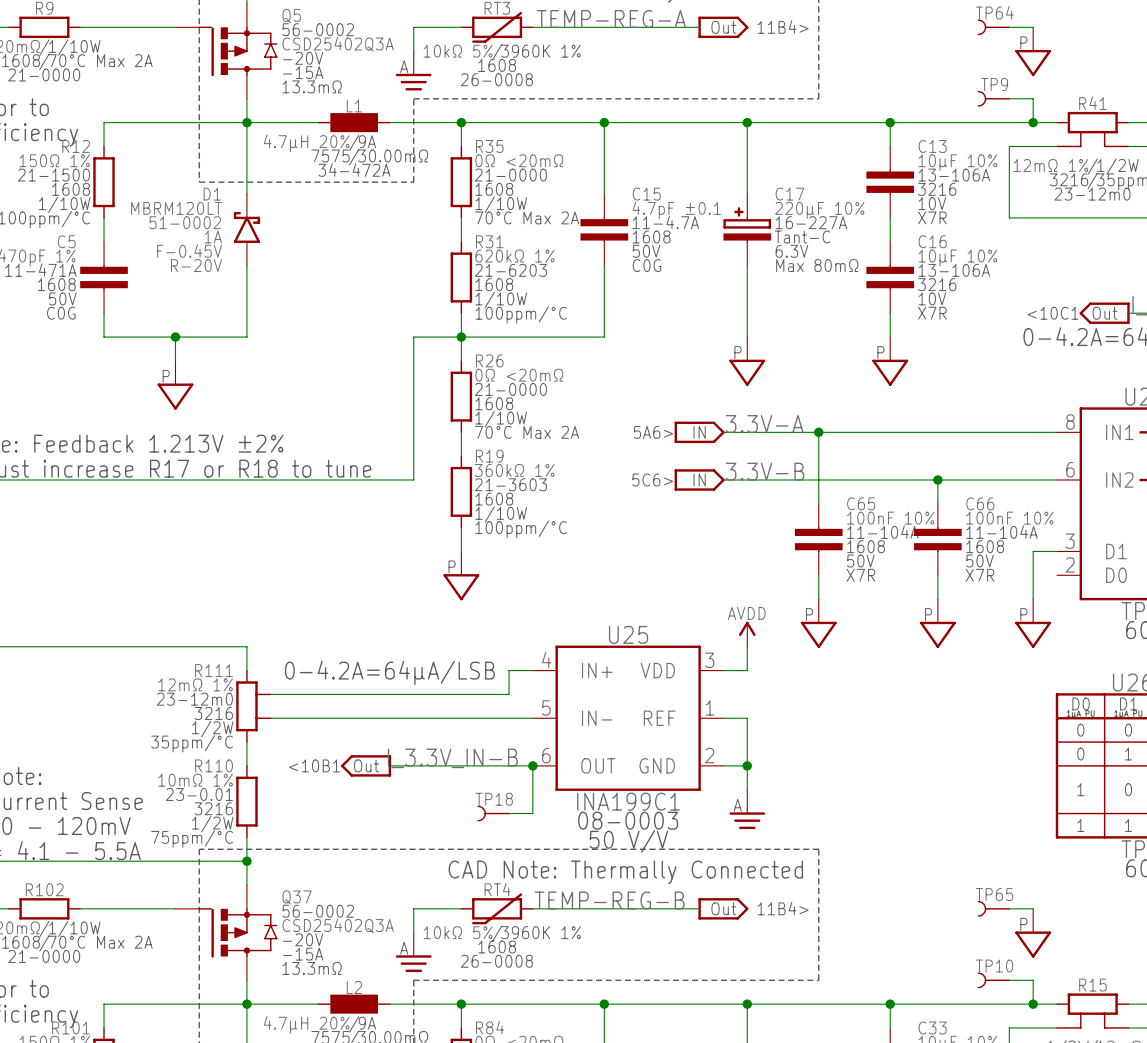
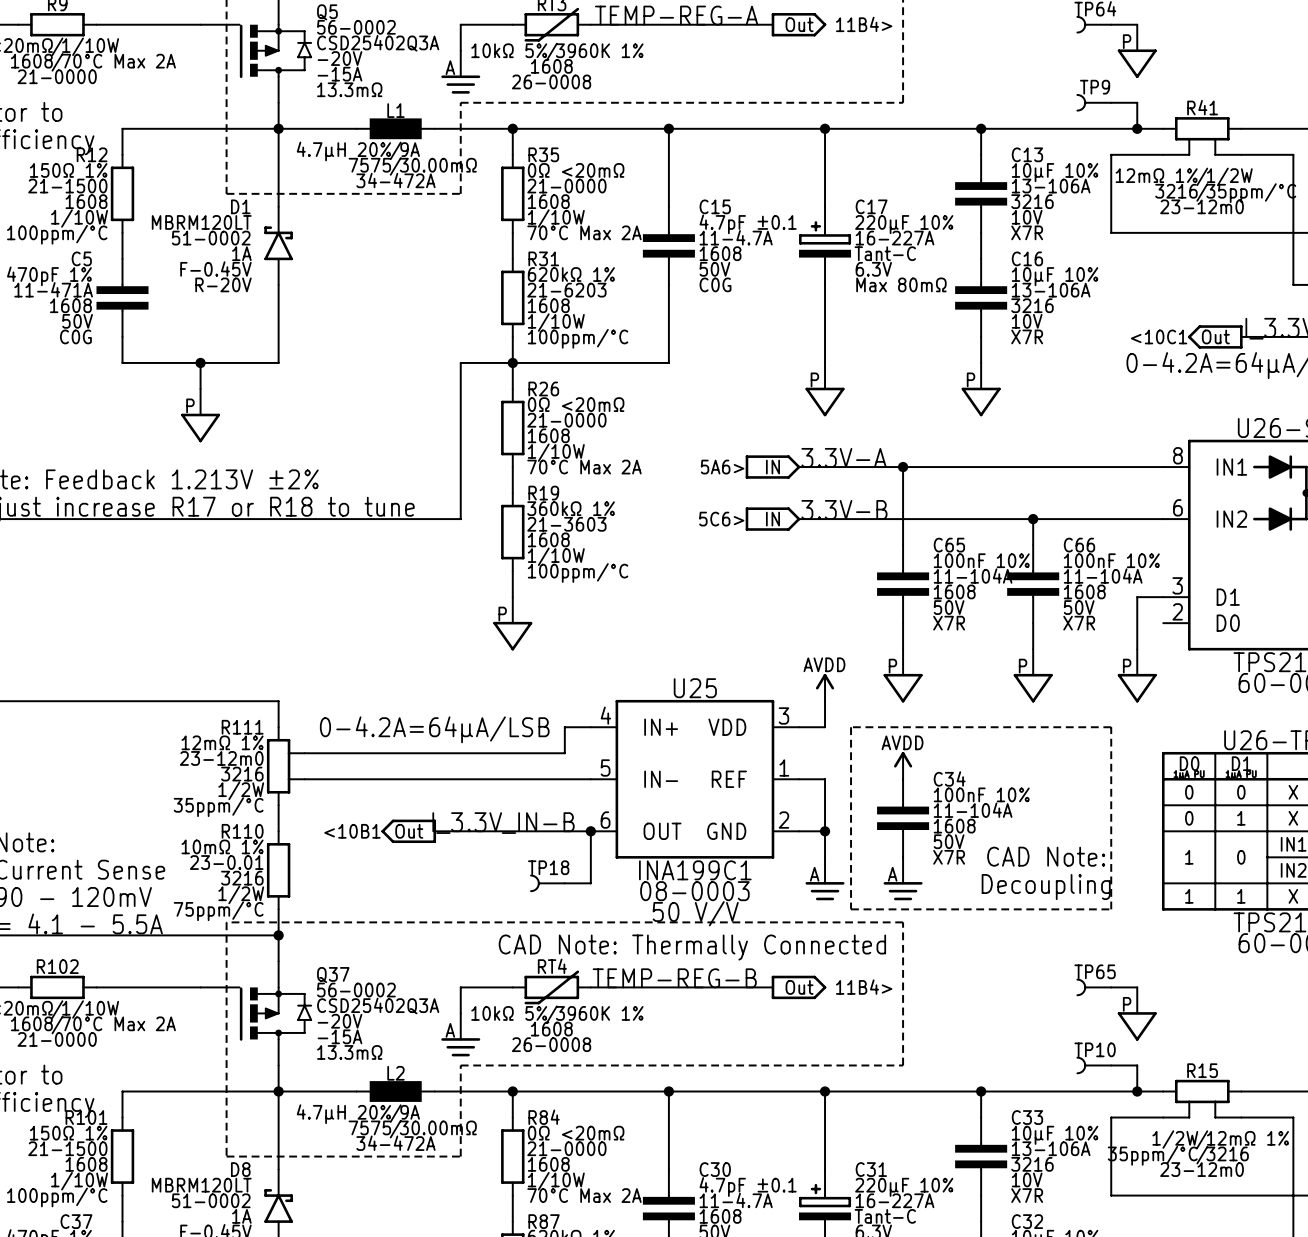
line: none -> (851, 727) (851, 909) (1111, 909) (1111, 727) (851, 727)
power symbol: none -> AVDD (903, 765)
C34: none -> 100nF 10% (903, 818)
text: none -> CAD Note: (1046, 856)
power symbol: none -> (903, 878)
text: none -> Decoupling (1046, 887)

